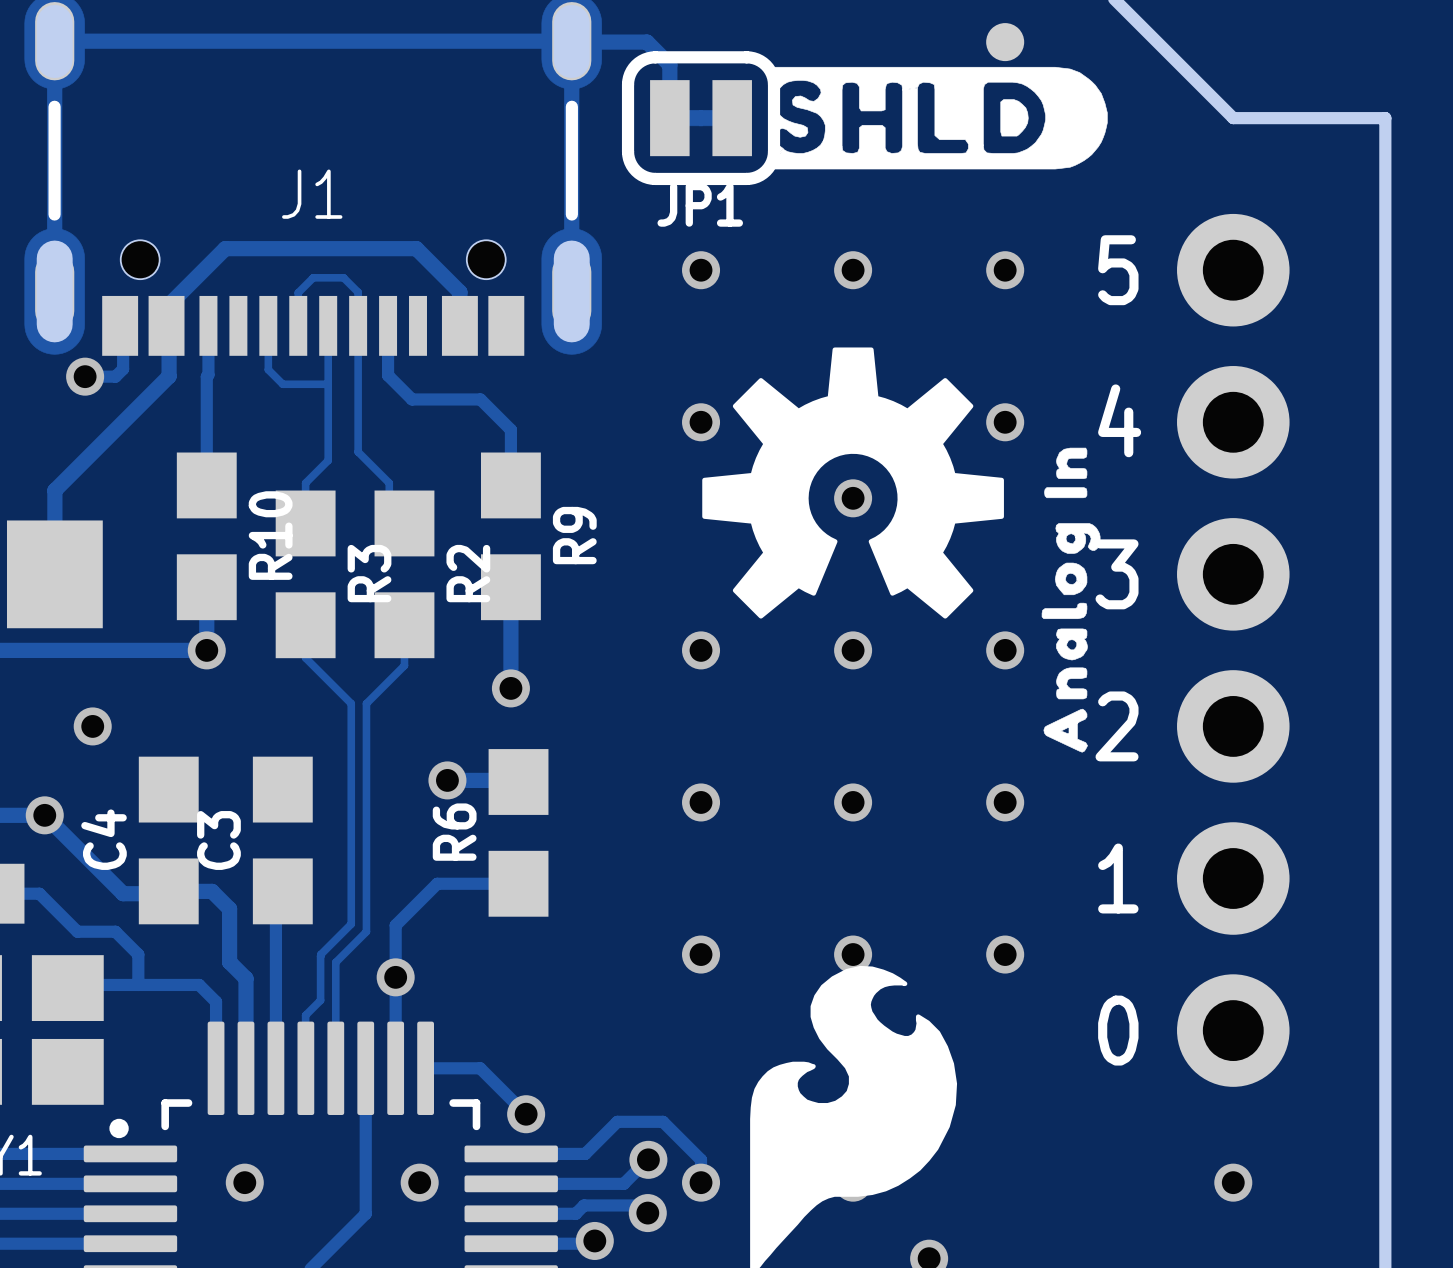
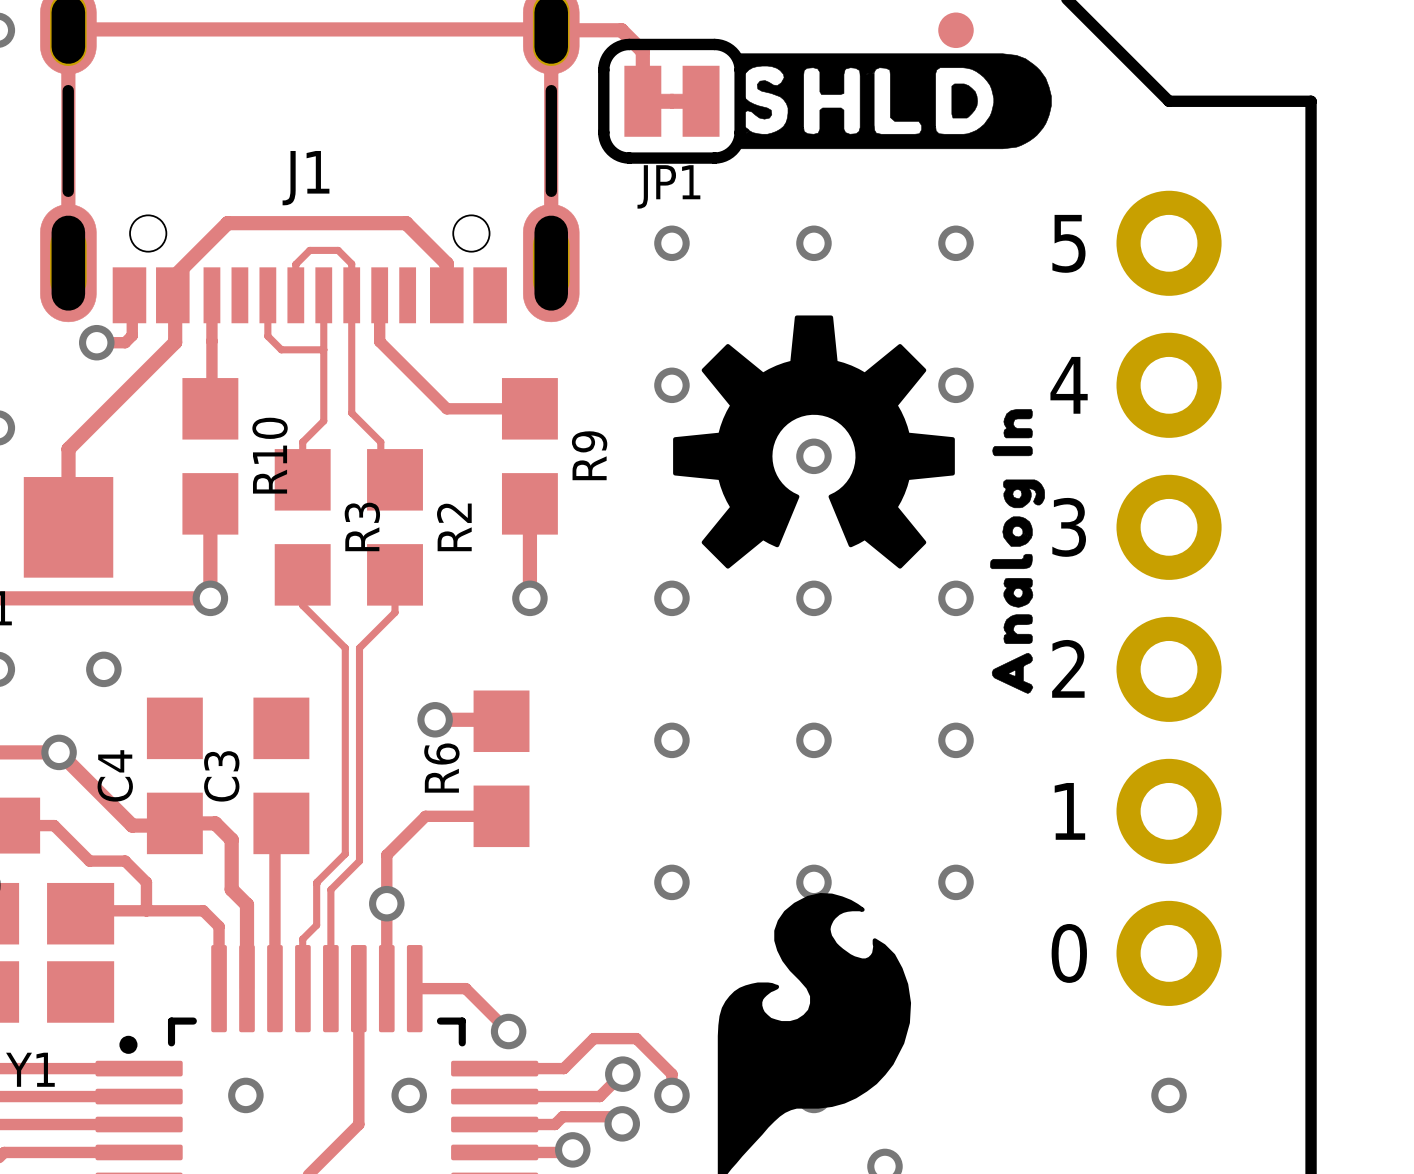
track: (208, 374) (206, 376) (206, 485) -> (211, 341) (211, 407) (210, 408)
track: (412, 399) (480, 399) (510, 429) (510, 485) -> (402, 364) (446, 408) (529, 408)
R10 position: (206, 536) -> (210, 456)
R9 position: (510, 536) -> (529, 456)
track: (510, 587) (510, 688) -> (529, 503) (529, 598)
via position: (510, 688) -> (529, 598)

